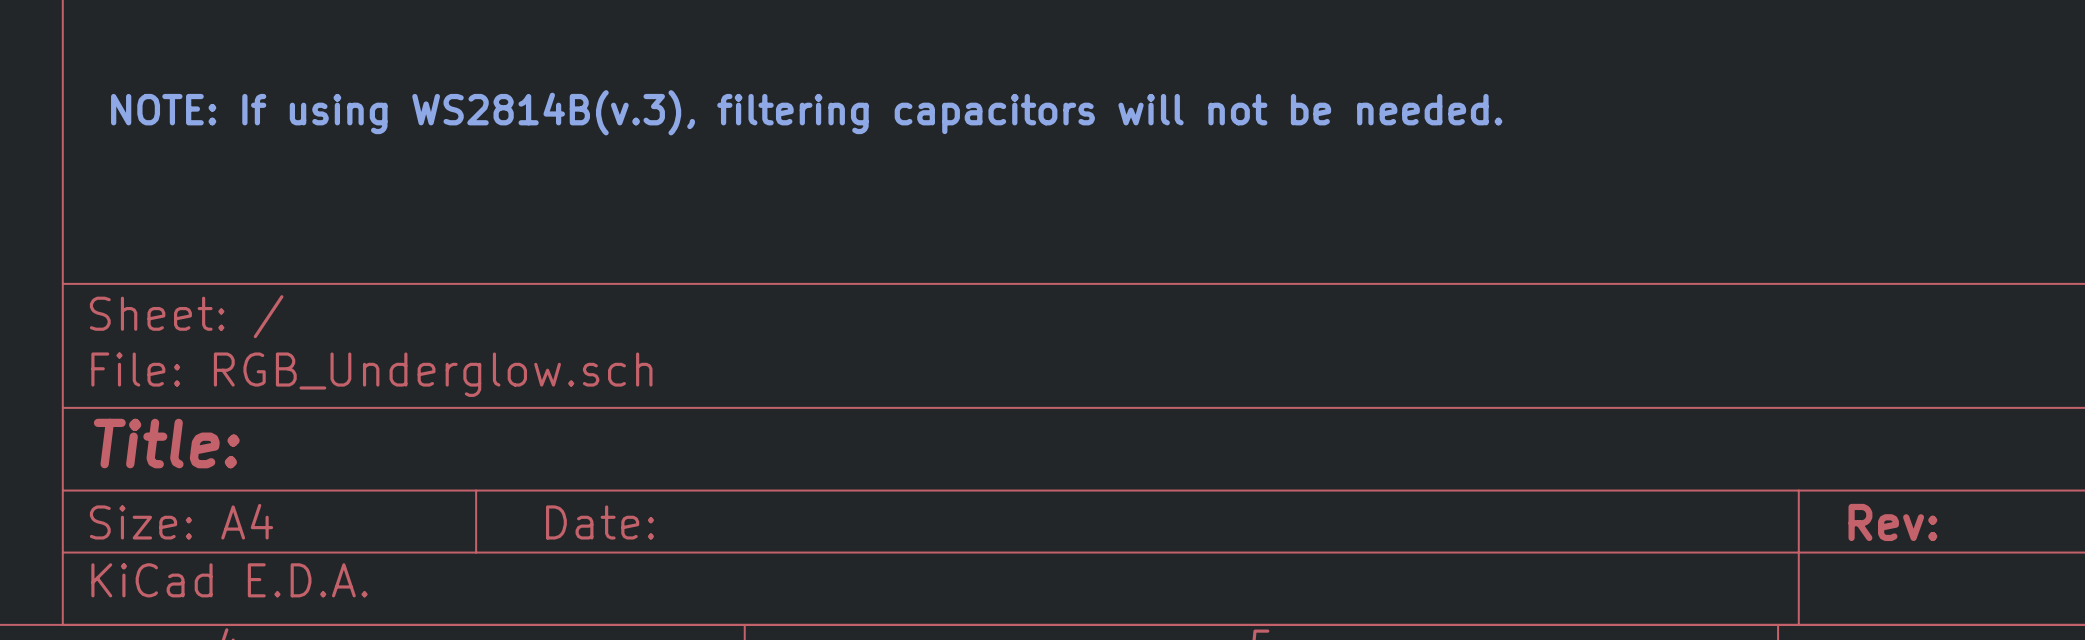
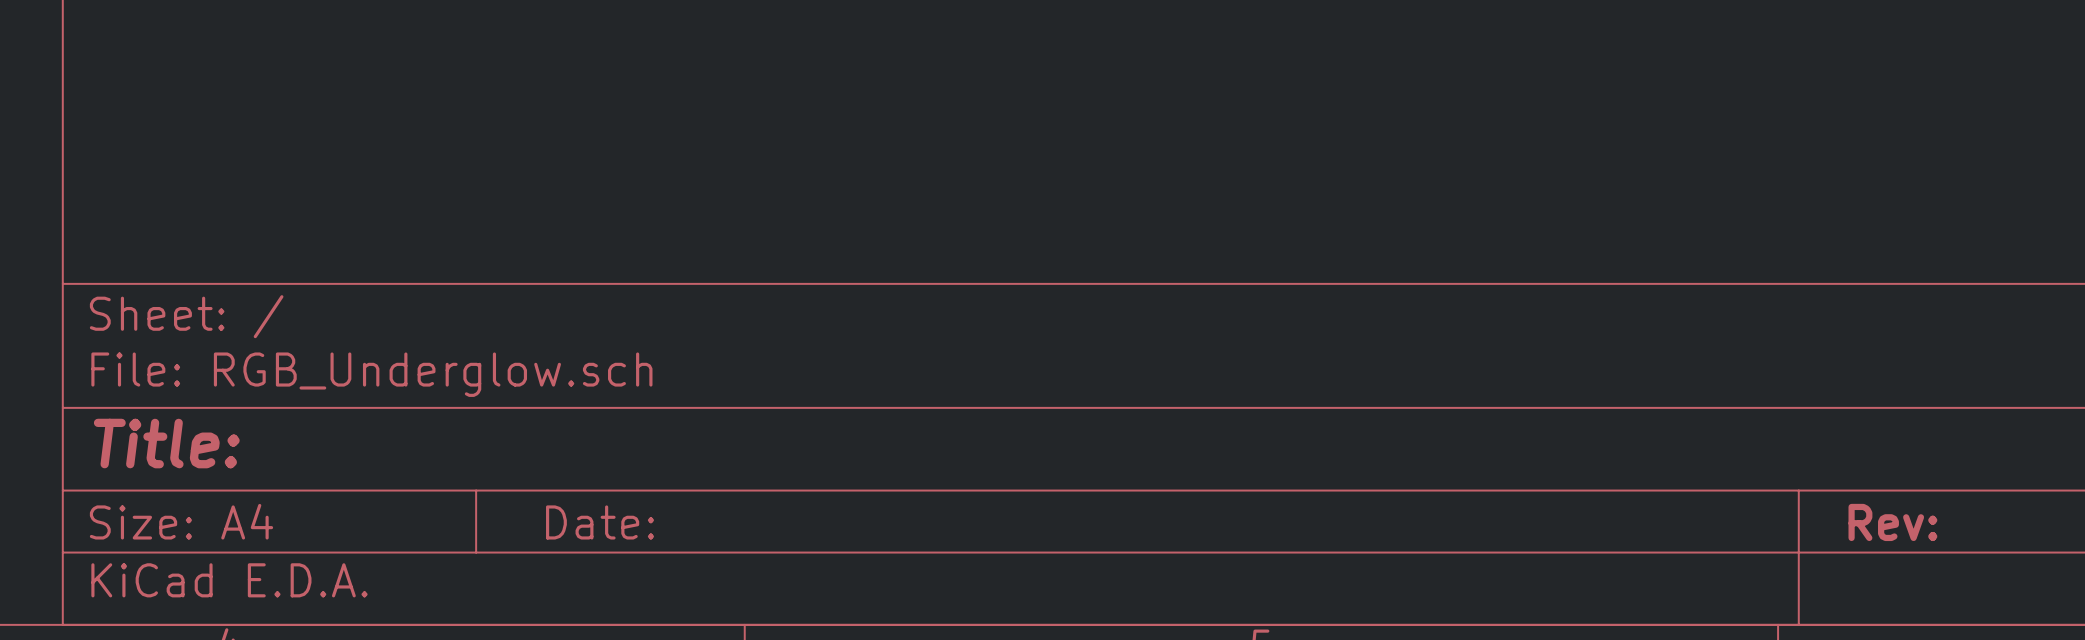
text: NOTE: If using WS2814B(v.3), filtering capacitors will not be needed. (806, 112) -> none

